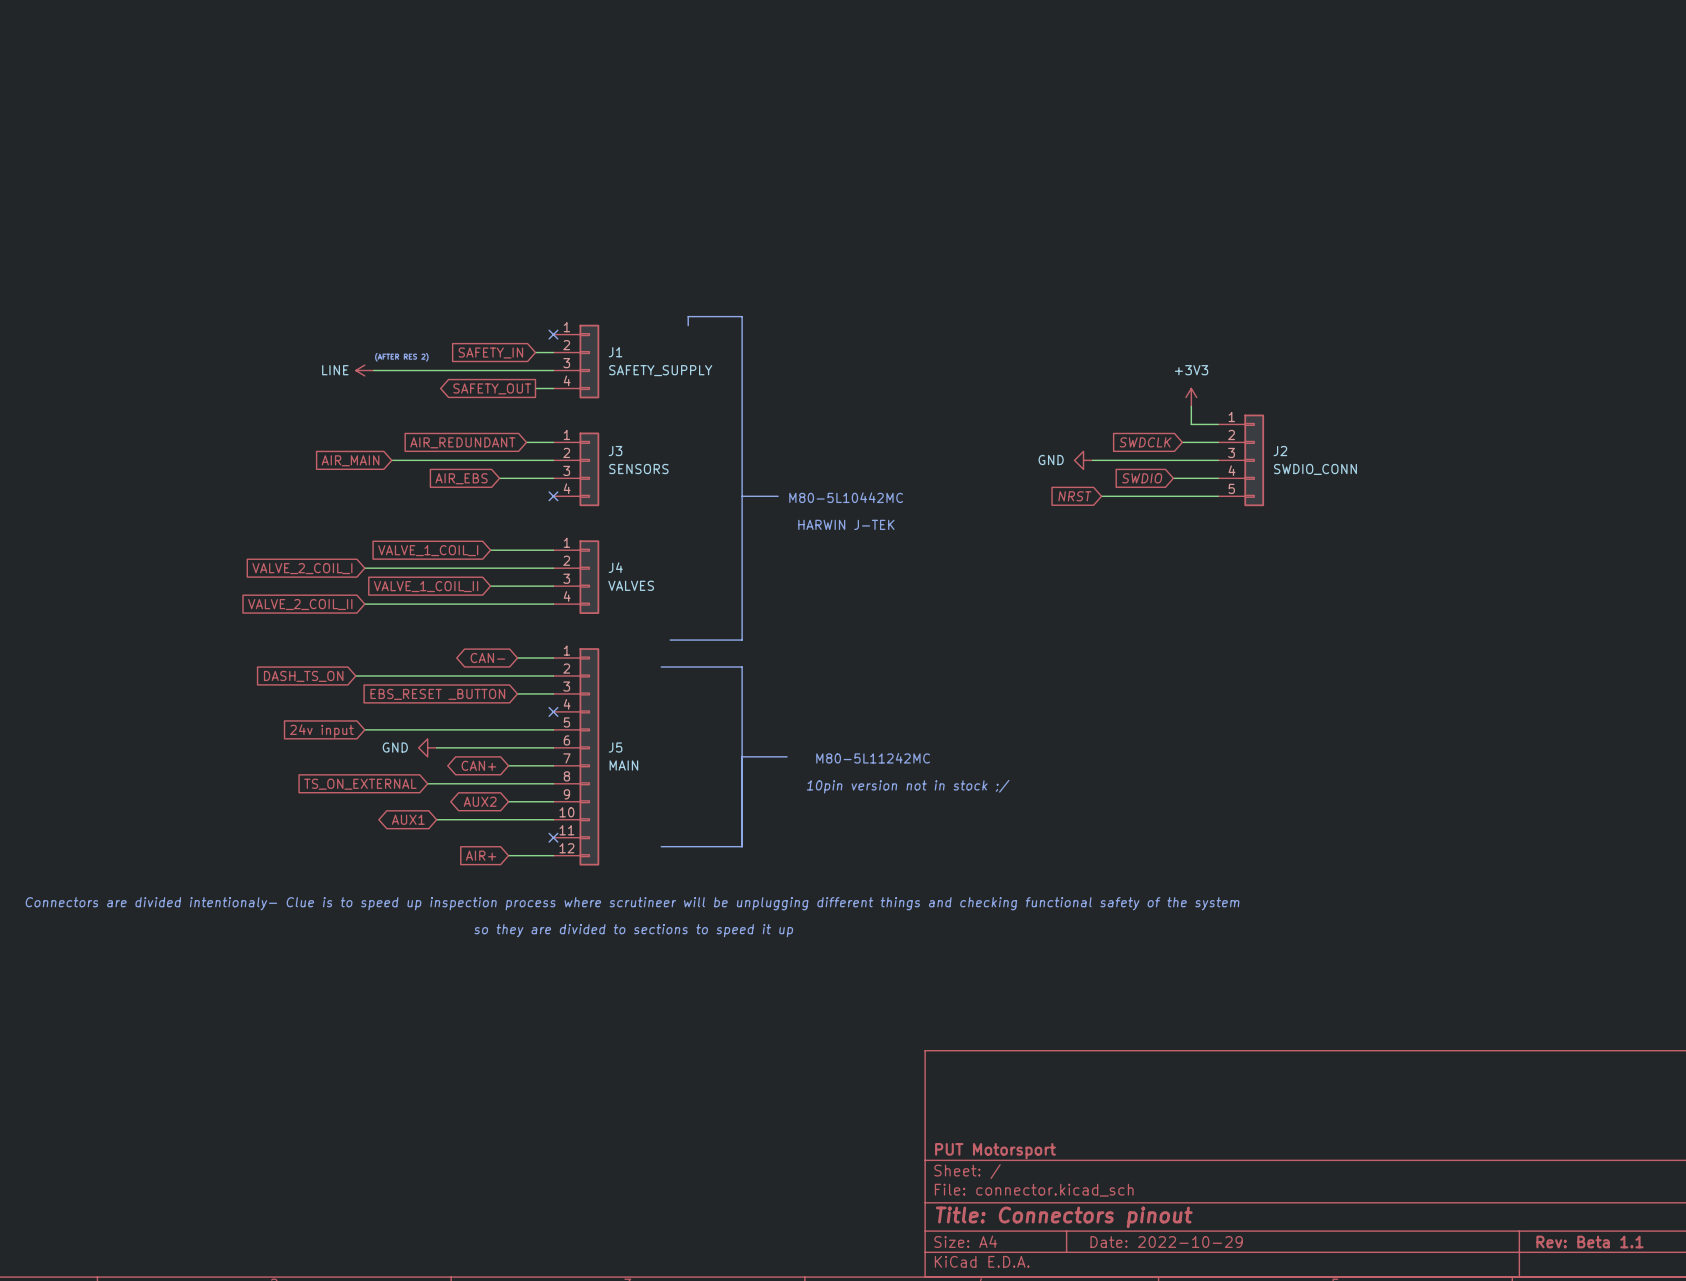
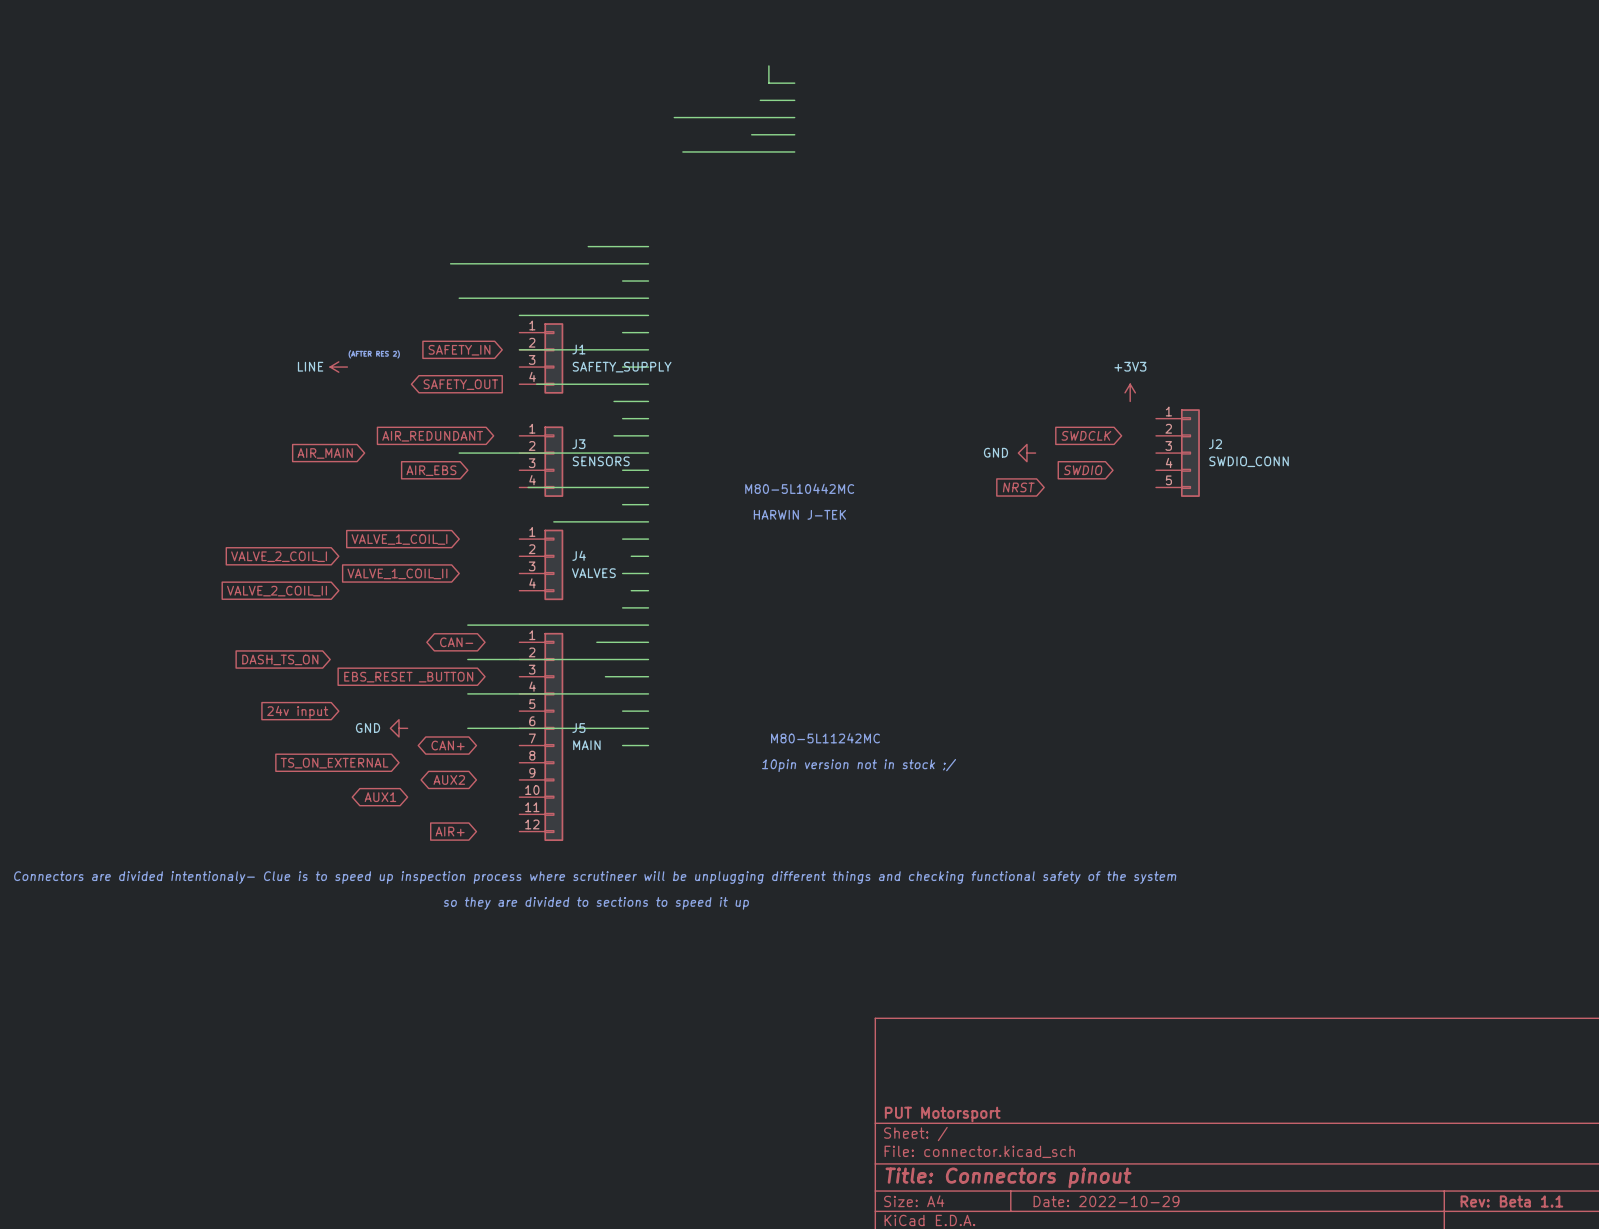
wire: none -> (768, 65) (768, 83) (794, 83)
wire: none -> (760, 100) (794, 100)
wire: none -> (674, 117) (794, 117)
wire: none -> (751, 134) (794, 134)
wire: none -> (682, 151) (794, 151)
wire: none -> (588, 246) (648, 246)
wire: none -> (450, 263) (648, 263)
wire: none -> (622, 281) (648, 281)
wire: none -> (459, 298) (648, 298)
wire: none -> (519, 315) (648, 315)
line: (688, 325) (688, 316) (742, 316) (742, 640) (670, 640) -> none
no-connect mark: (553, 334) -> none
wire: none -> (622, 332) (648, 332)
wire: (535, 352) (553, 352) -> (648, 349) (519, 349)
wire: (373, 370) (553, 370) -> none
wire: none -> (622, 367) (648, 367)
wire: (535, 388) (553, 388) -> none
wire: none -> (536, 384) (648, 384)
wire: none -> (614, 401) (648, 401)
wire: (1191, 406) (1191, 424) (1218, 424) -> none
wire: (526, 442) (553, 442) -> (622, 418) (648, 418)
wire: none -> (614, 435) (648, 435)
wire: (1182, 442) (1218, 442) -> none
wire: (391, 460) (490, 460) -> none
wire: none -> (519, 453) (648, 453)
wire: (1092, 460) (1218, 460) -> none
wire: (499, 478) (553, 478) -> none
wire: none -> (622, 470) (648, 470)
wire: (1173, 478) (1218, 478) -> none
no-connect mark: (553, 496) -> none
wire: none -> (528, 487) (648, 487)
line: (742, 496) (778, 496) -> none
wire: (1101, 496) (1218, 496) -> none
wire: none -> (622, 504) (648, 504)
wire: none -> (553, 521) (648, 521)
wire: (490, 550) (553, 550) -> none
wire: none -> (622, 539) (648, 539)
wire: (364, 568) (553, 568) -> none
wire: none -> (631, 556) (648, 556)
wire: (490, 586) (553, 586) -> none
wire: none -> (622, 573) (648, 573)
wire: (364, 604) (553, 604) -> (467, 625) (648, 625)
wire: none -> (631, 590) (648, 590)
wire: none -> (622, 607) (648, 607)
wire: (517, 658) (553, 658) -> none
wire: none -> (596, 642) (648, 642)
line: (661, 667) (742, 667) (742, 846) (661, 846) -> none
wire: (355, 675) (499, 675) -> none
wire: none -> (519, 659) (648, 659)
wire: (517, 693) (553, 693) -> none
no-connect mark: (553, 711) -> none
wire: (364, 729) (553, 729) -> (467, 693) (648, 693)
wire: none -> (622, 711) (648, 711)
wire: (436, 747) (499, 747) -> none
wire: none -> (519, 728) (648, 728)
line: (742, 756) (787, 756) -> none
wire: (508, 765) (553, 765) -> (605, 676) (648, 676)
wire: none -> (622, 745) (648, 745)
wire: (427, 783) (553, 783) -> none
wire: (508, 801) (553, 801) -> none
wire: (436, 819) (553, 819) -> none
no-connect mark: (553, 837) -> none
wire: (508, 855) (553, 855) -> none

